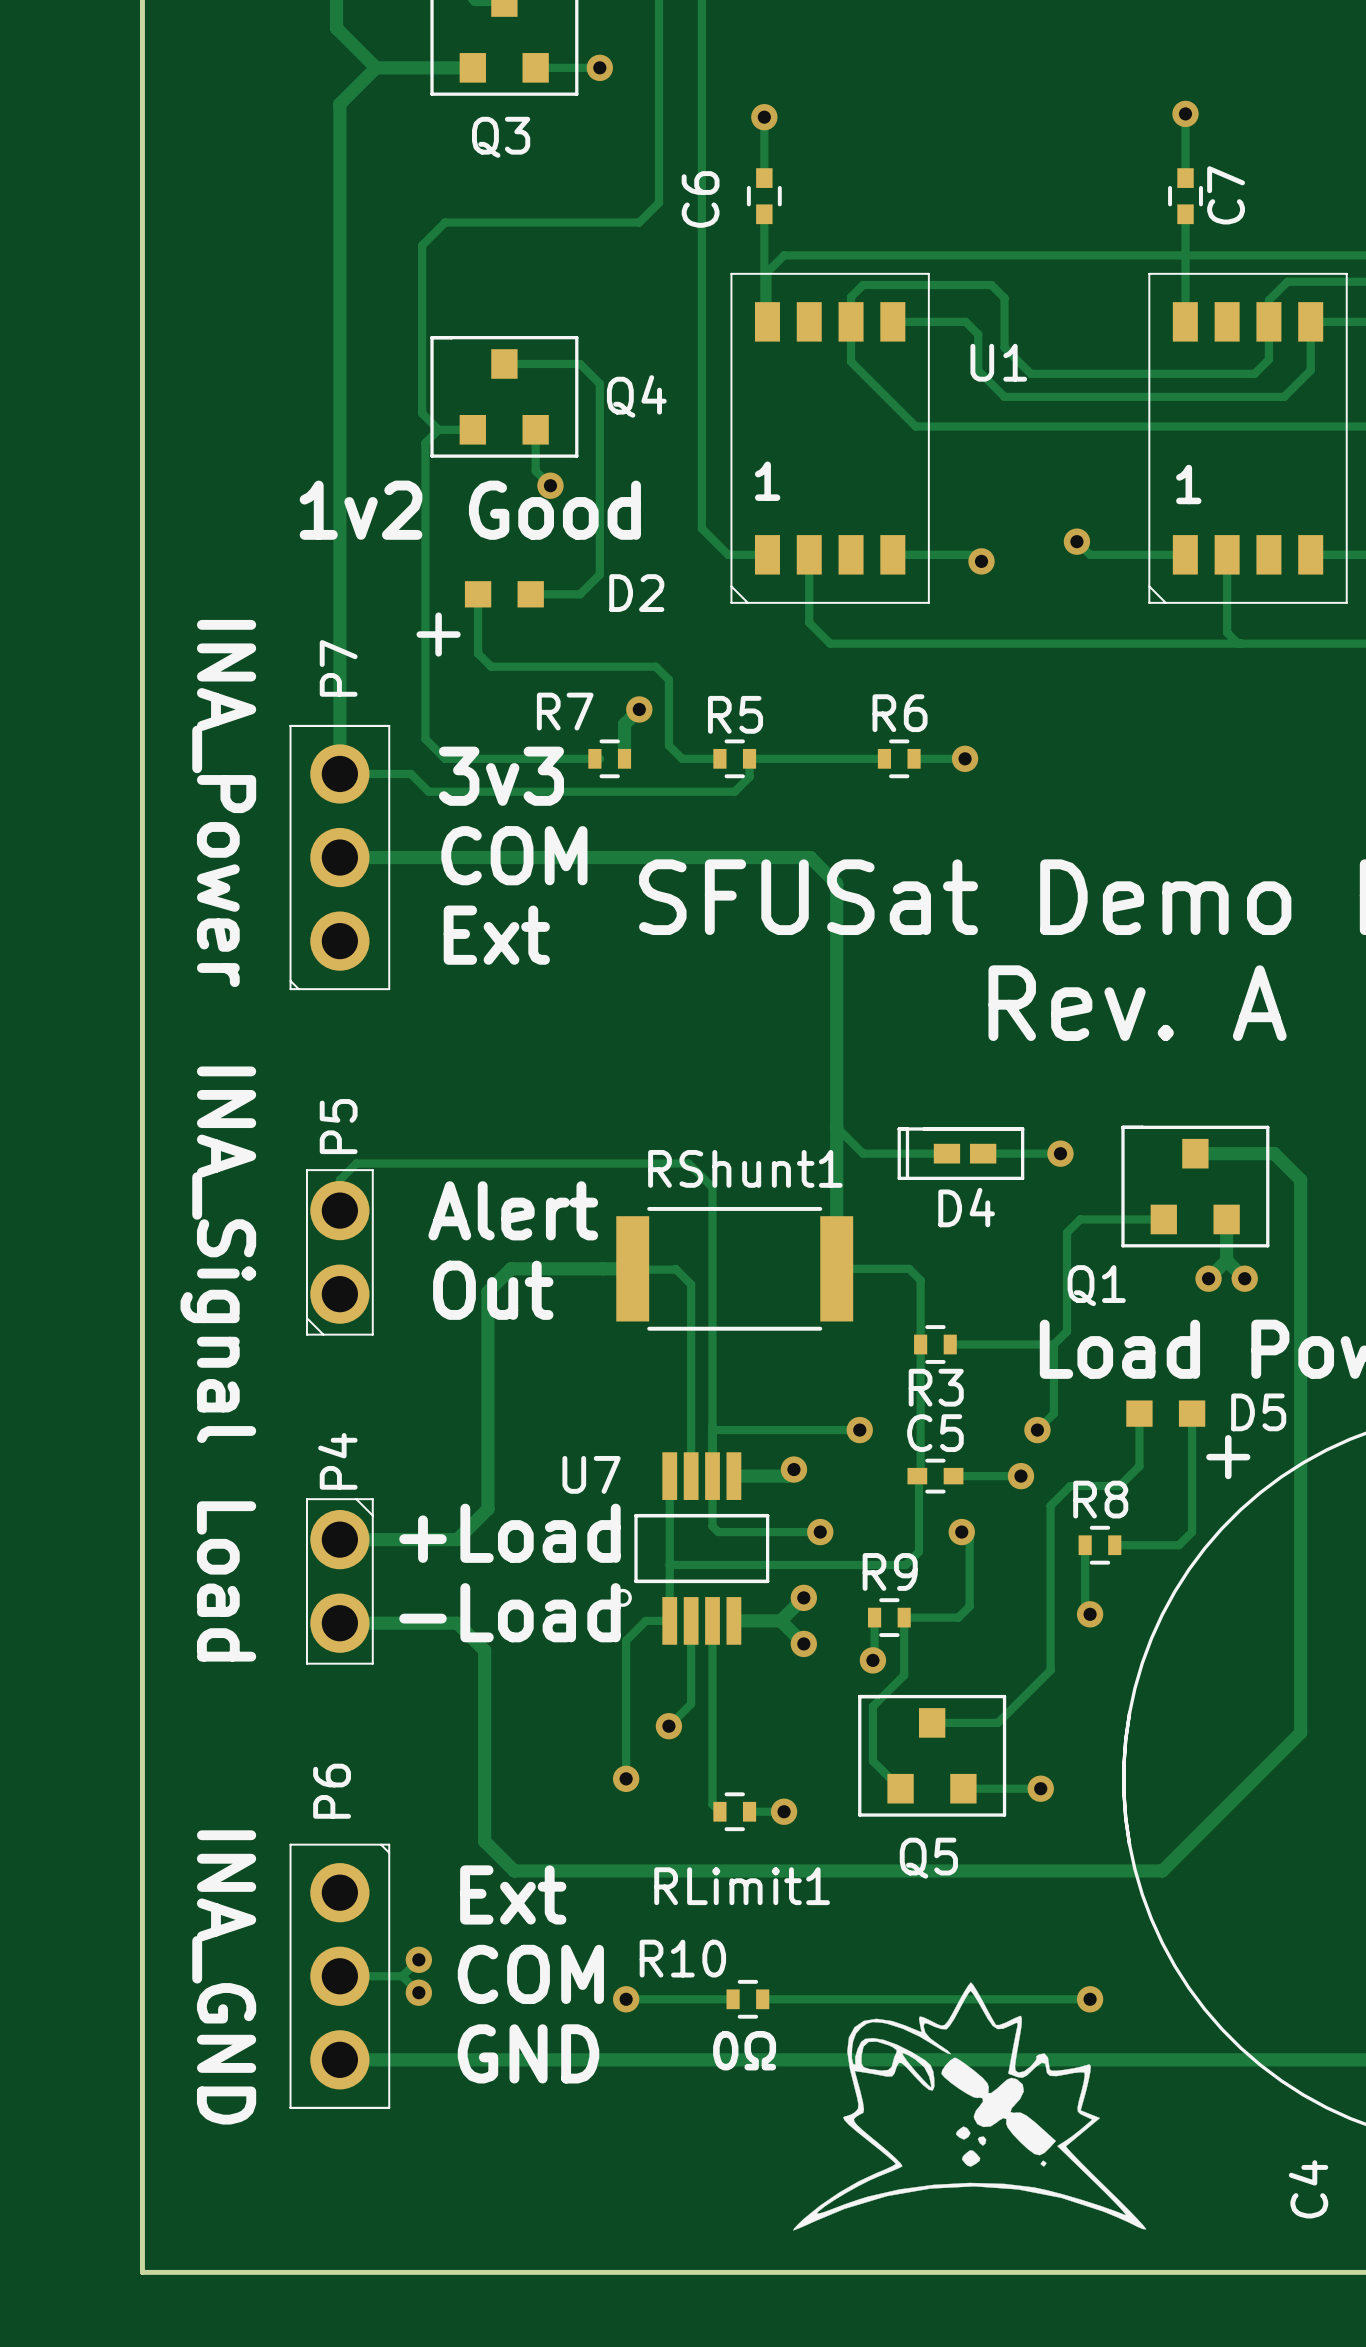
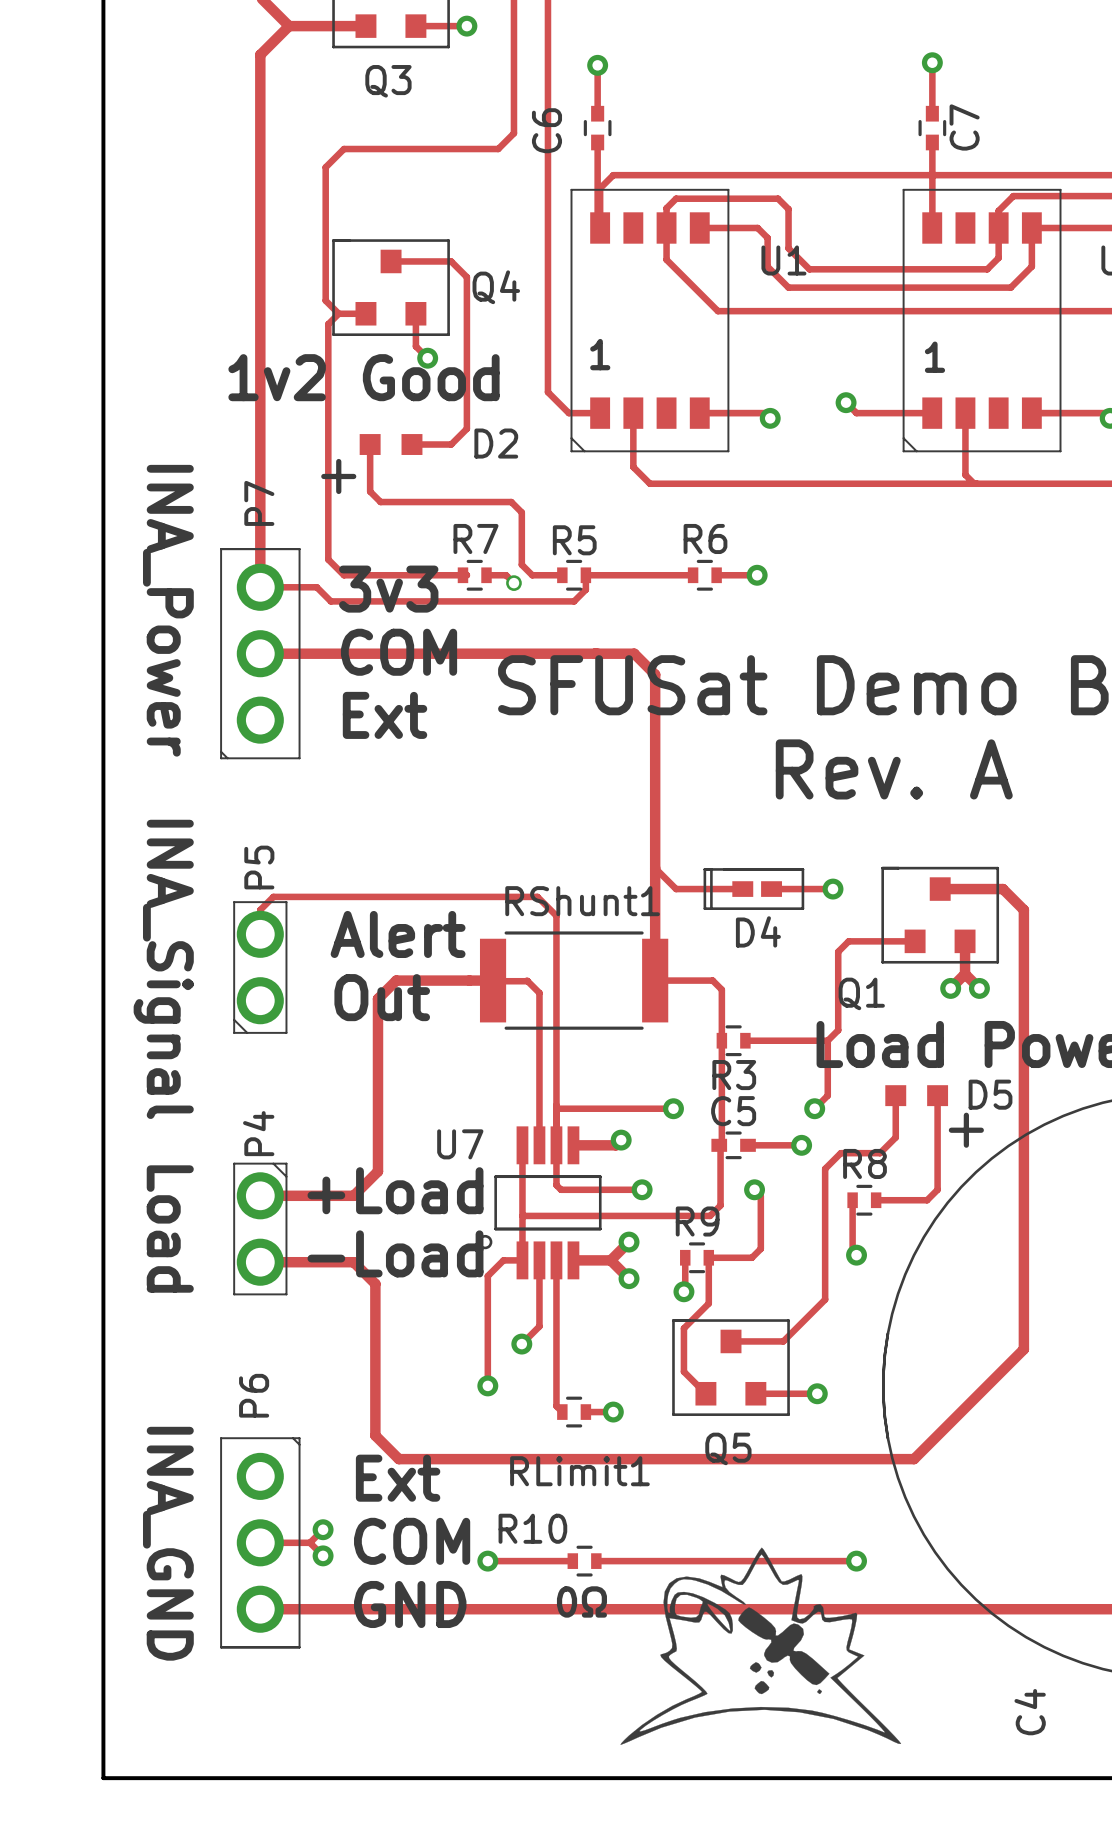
track: (639, 709) (624, 724) (624, 758) -> (513, 583) (506, 575) (486, 575)
via: (639, 709) -> none
R7 name position: R7 (565, 711) -> R7 (475, 538)
via: none -> (513, 583)

